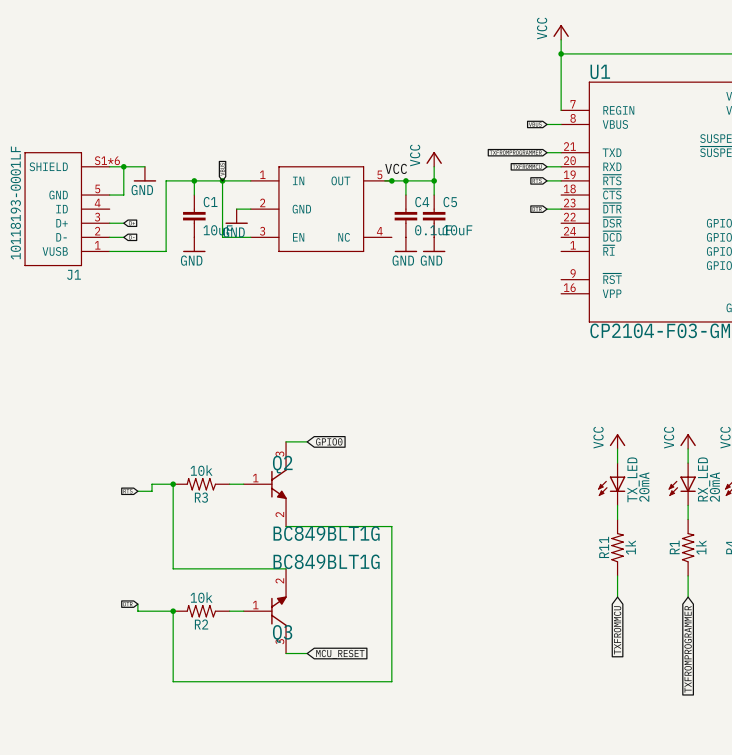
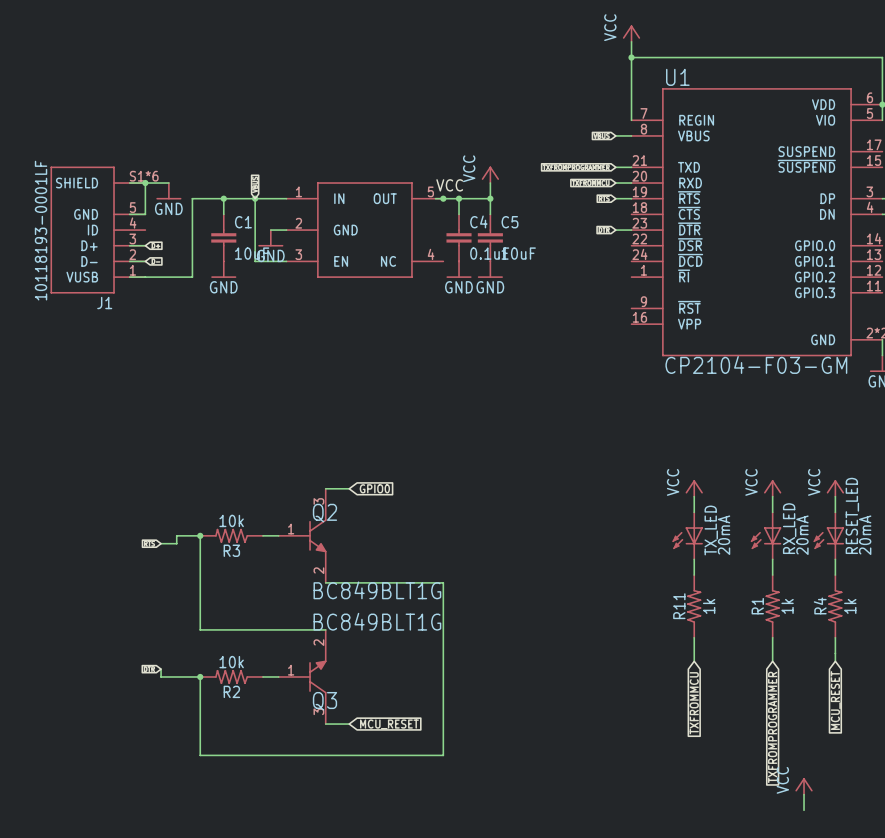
J1 position: (67, 209) -> (98, 230)
power symbol: none -> VCC (804, 786)
wire: none -> (804, 794) (804, 810)

